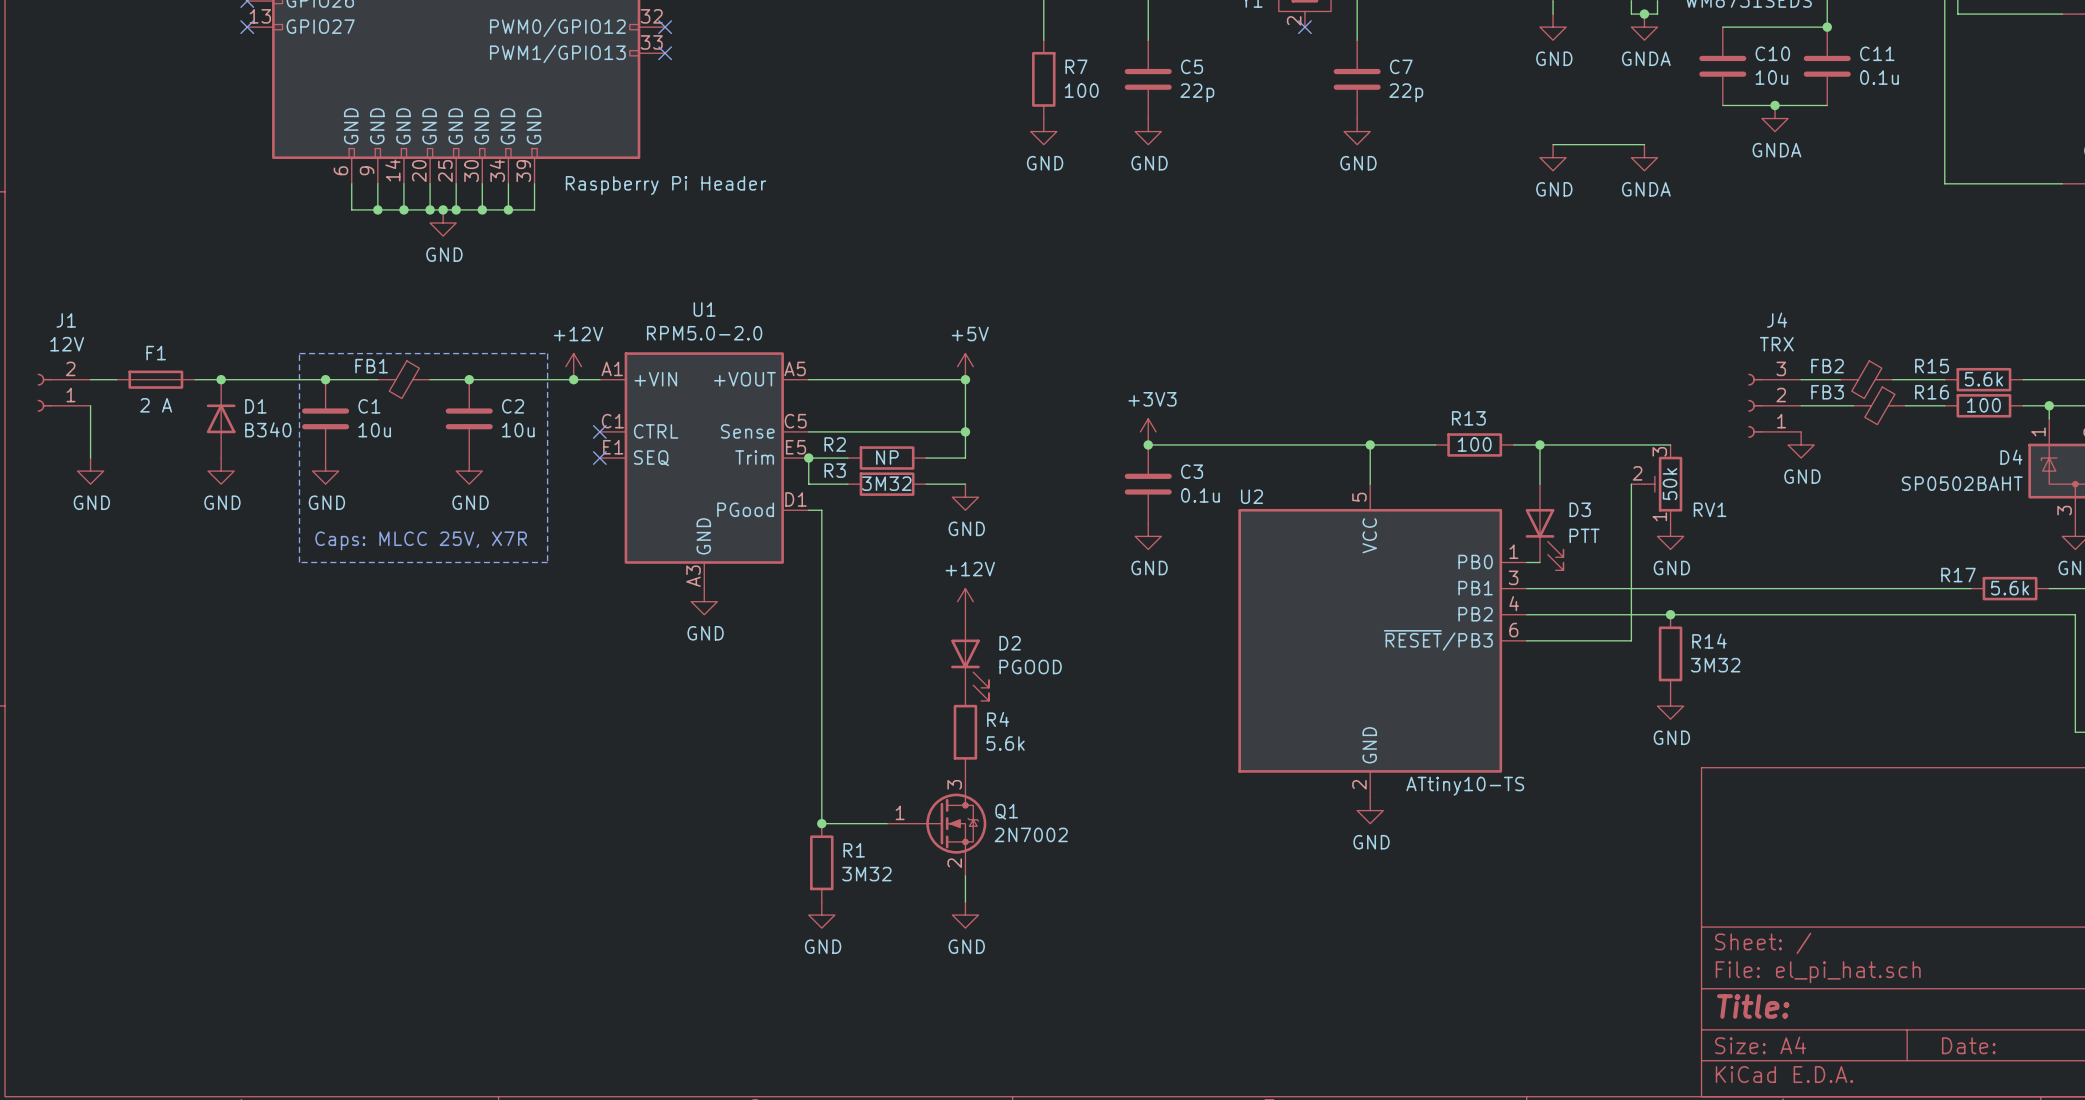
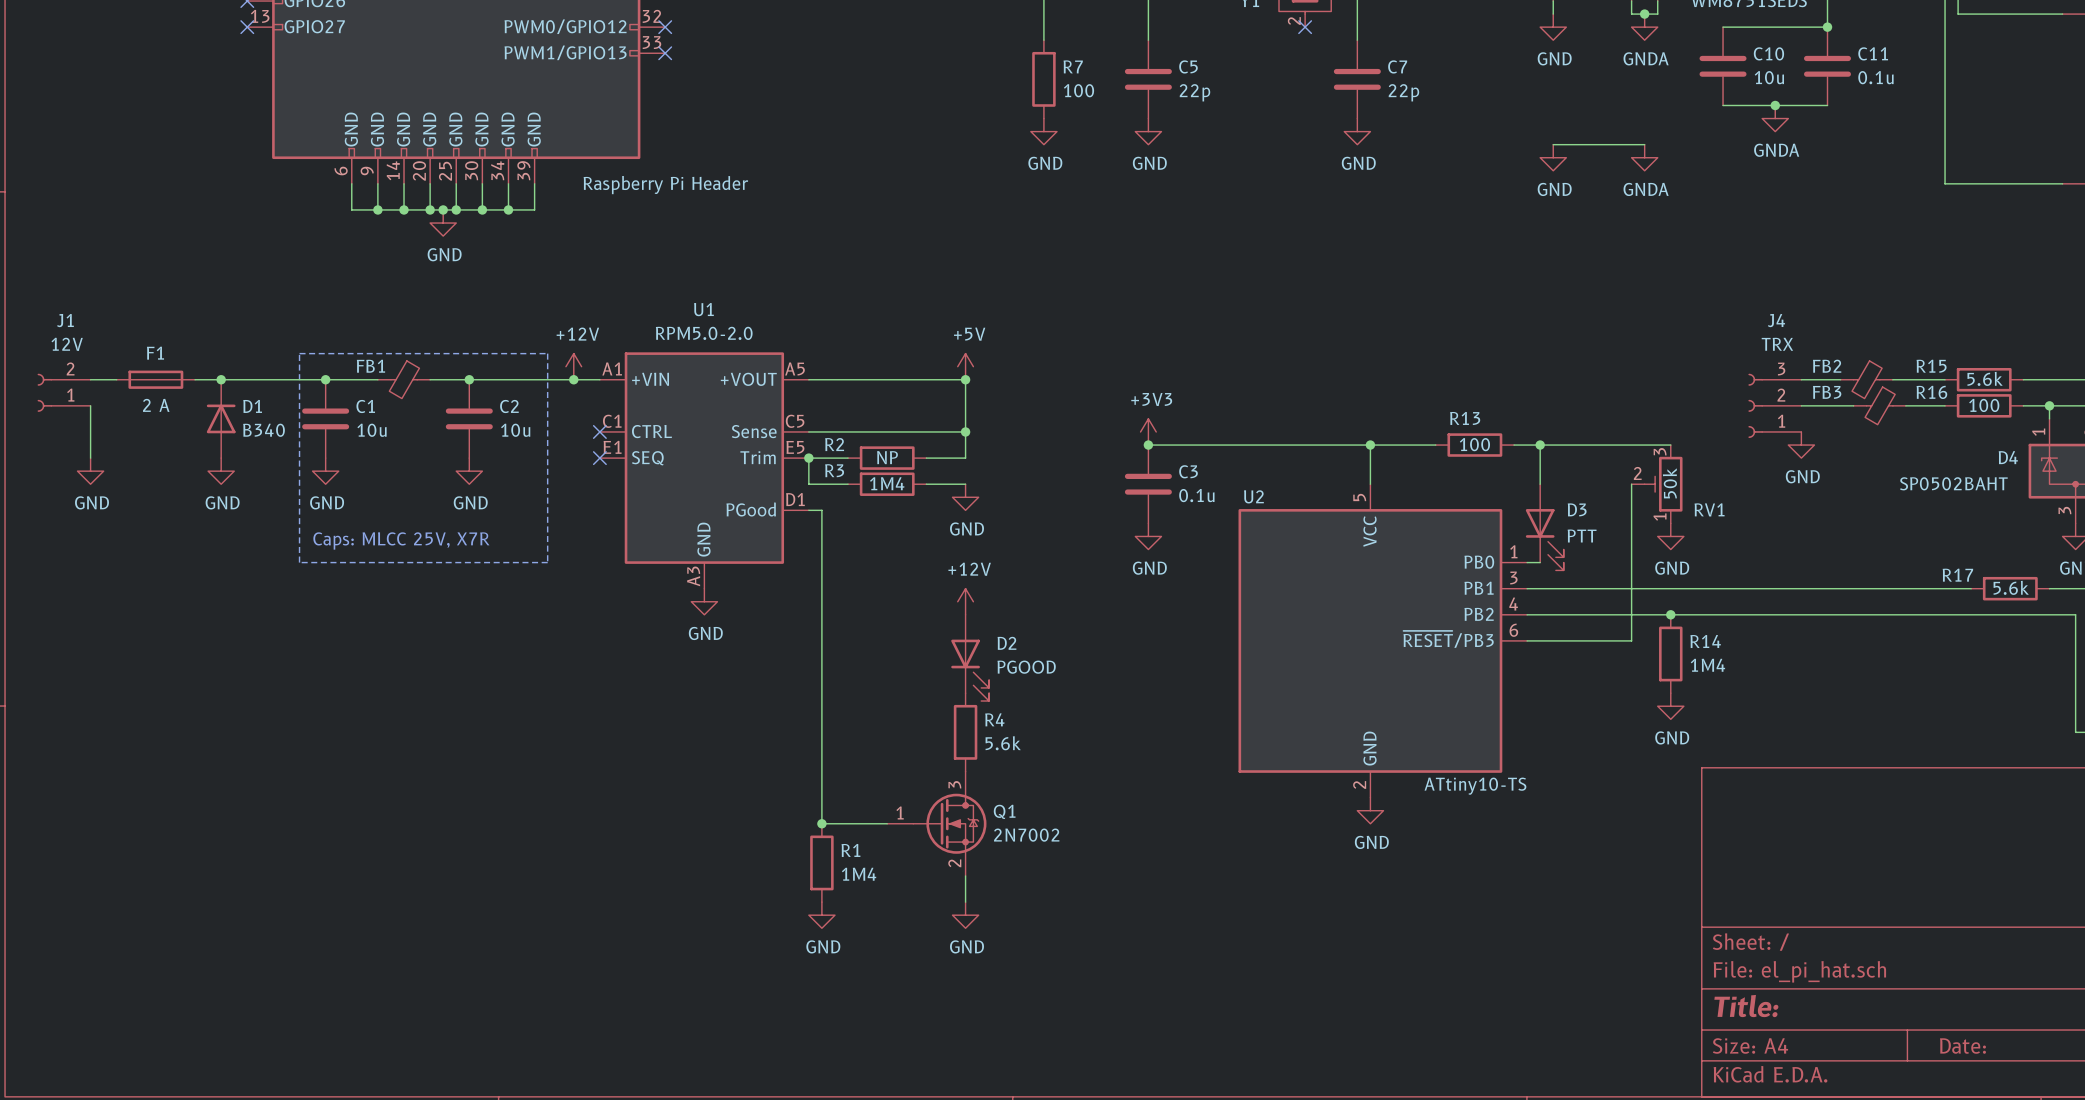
R3 value: 3M32 (886, 483) -> 1M4 (887, 483)
R14 value: 3M32 (1715, 665) -> 1M4 (1707, 665)
R1 value: 3M32 (866, 874) -> 1M4 (859, 874)

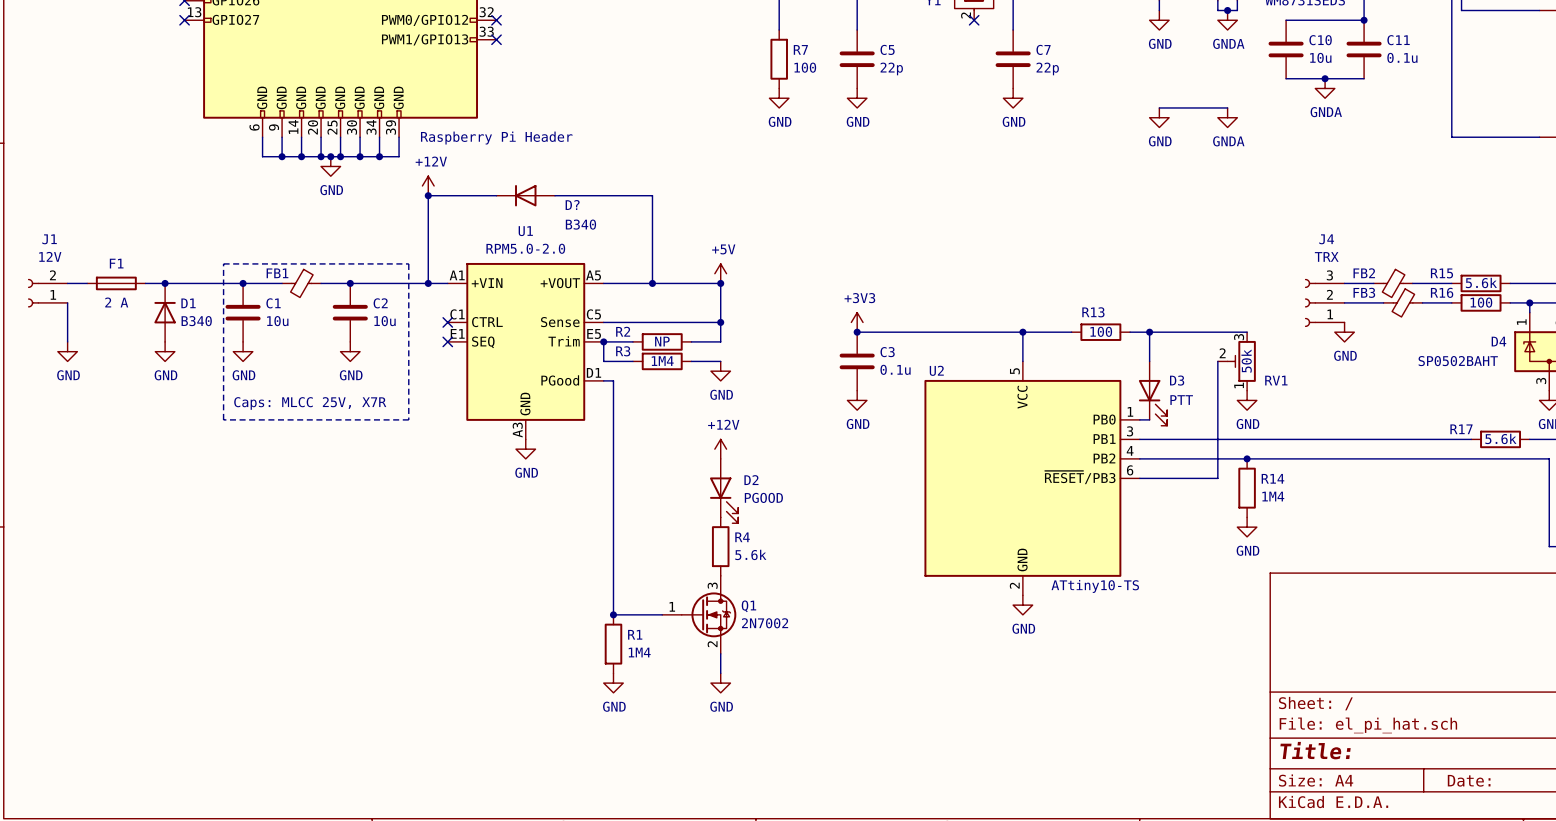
junction: none -> (428, 195)
wire: none -> (496, 195) (428, 195) (428, 283)
D?: none -> B340 (525, 195)
wire: none -> (555, 195) (652, 195) (652, 283)
power symbol position: +12V (573, 366) -> +12V (428, 185)
junction: none -> (652, 283)

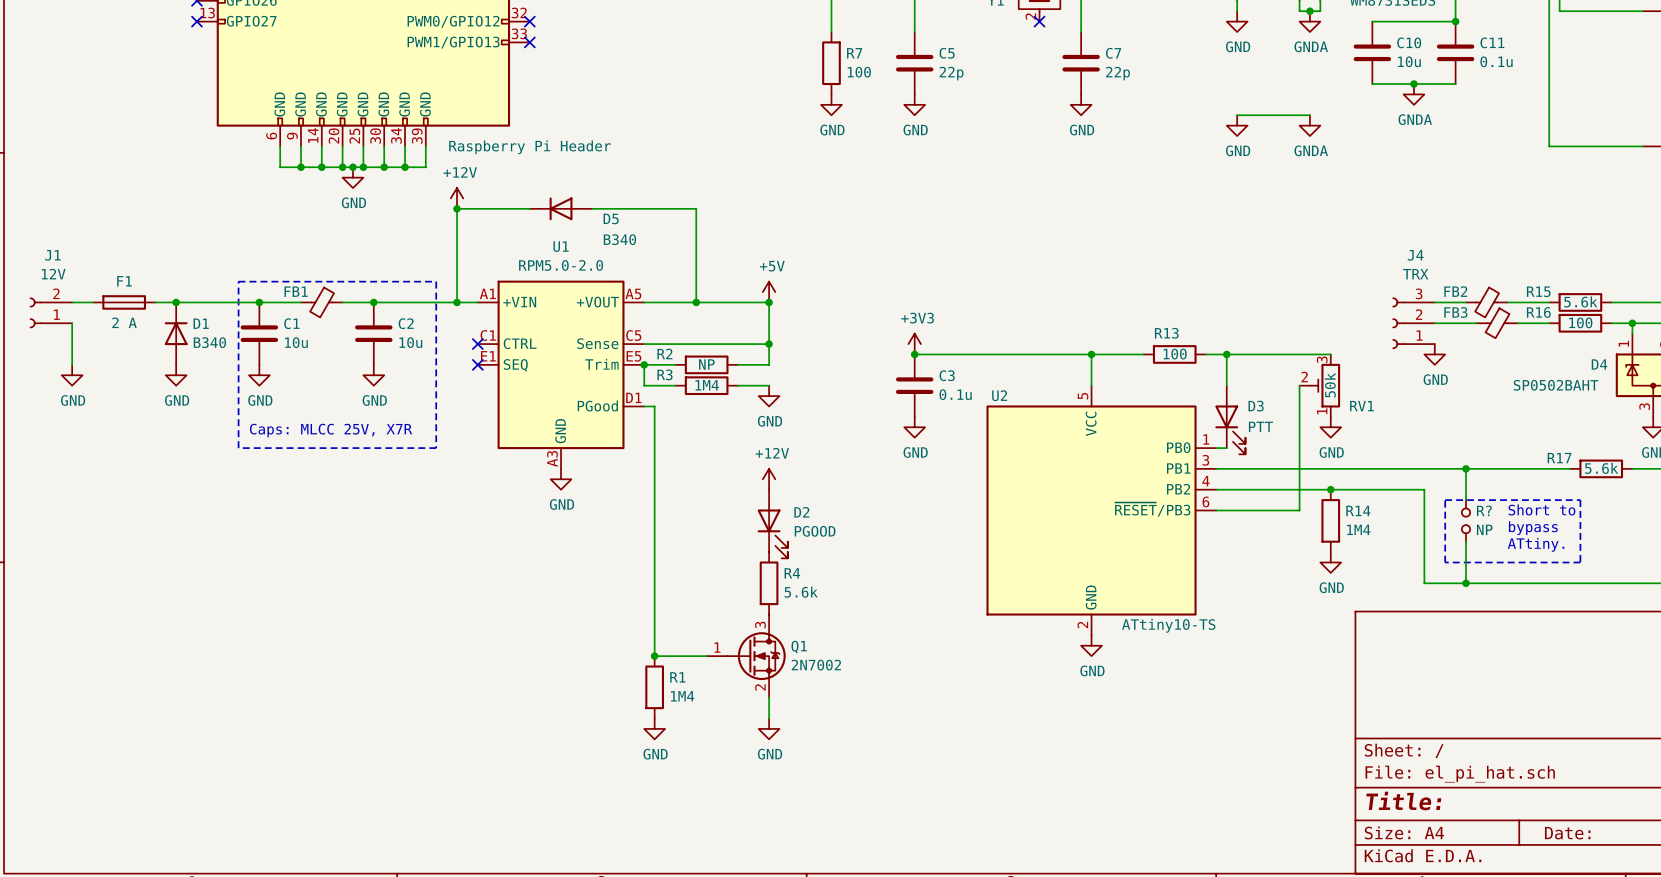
D? name: D? (572, 205) -> D5 (611, 218)
wire: none -> (1465, 468) (1465, 500)
junction: none -> (1465, 468)
wire: (1334, 458) (1549, 458) (1549, 546) -> (1424, 489) (1424, 583) (1653, 583)
line: none -> (1445, 500) (1580, 500) (1580, 562) (1445, 562) (1445, 500)
text: none -> Short to (1541, 509)
R?: none -> NP (1465, 520)
text: none -> bypass (1533, 528)
wire: none -> (1465, 541) (1465, 583)
text: none -> ATtiny. (1536, 544)
junction: none -> (1465, 583)

